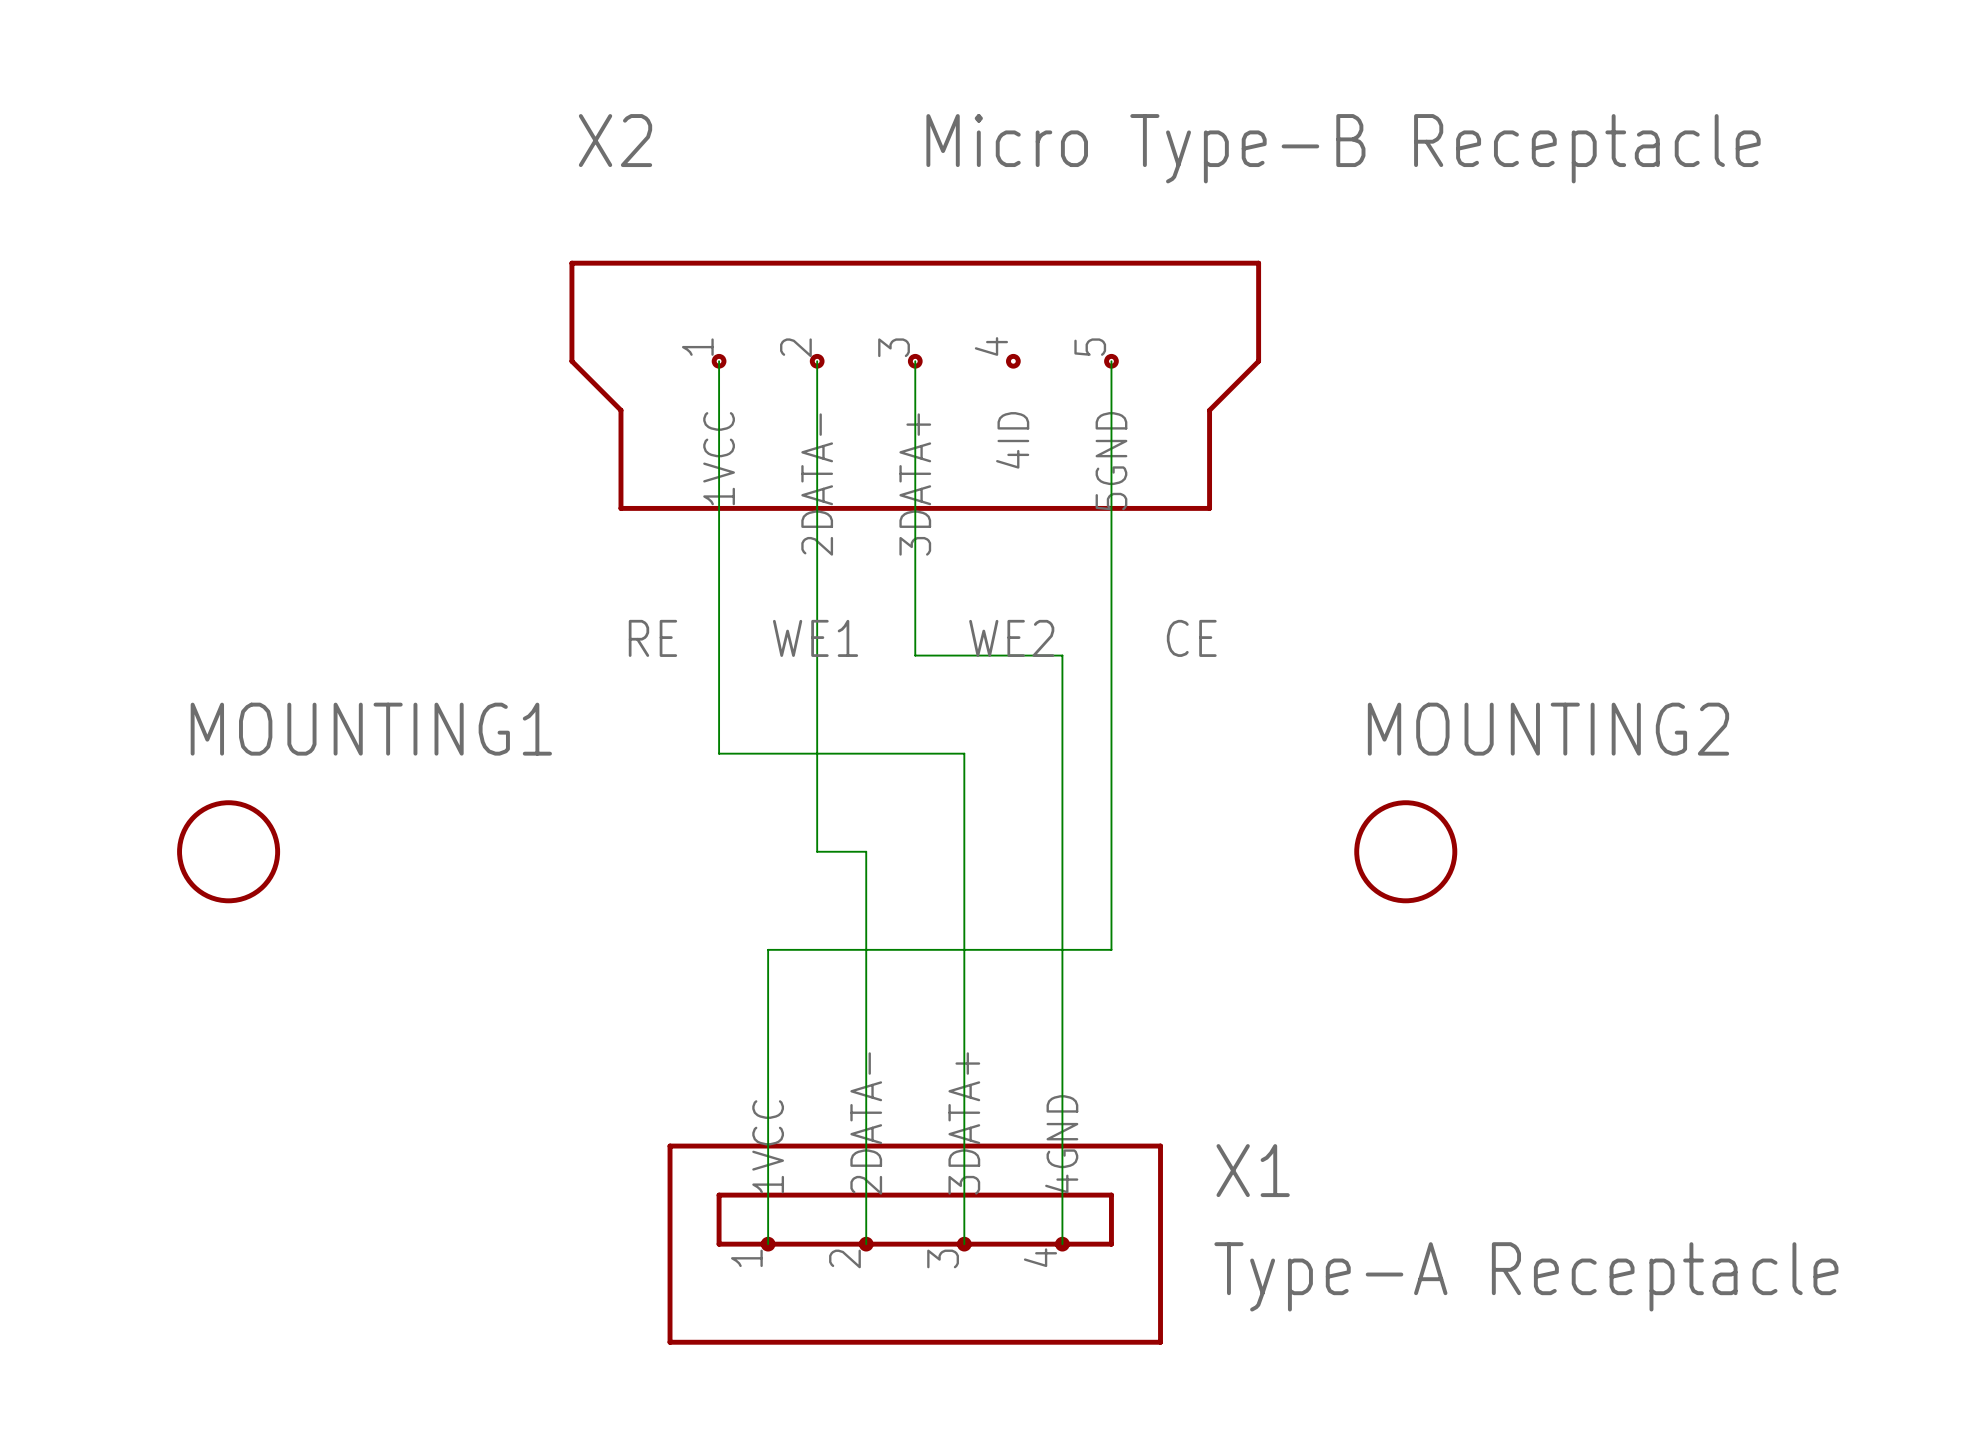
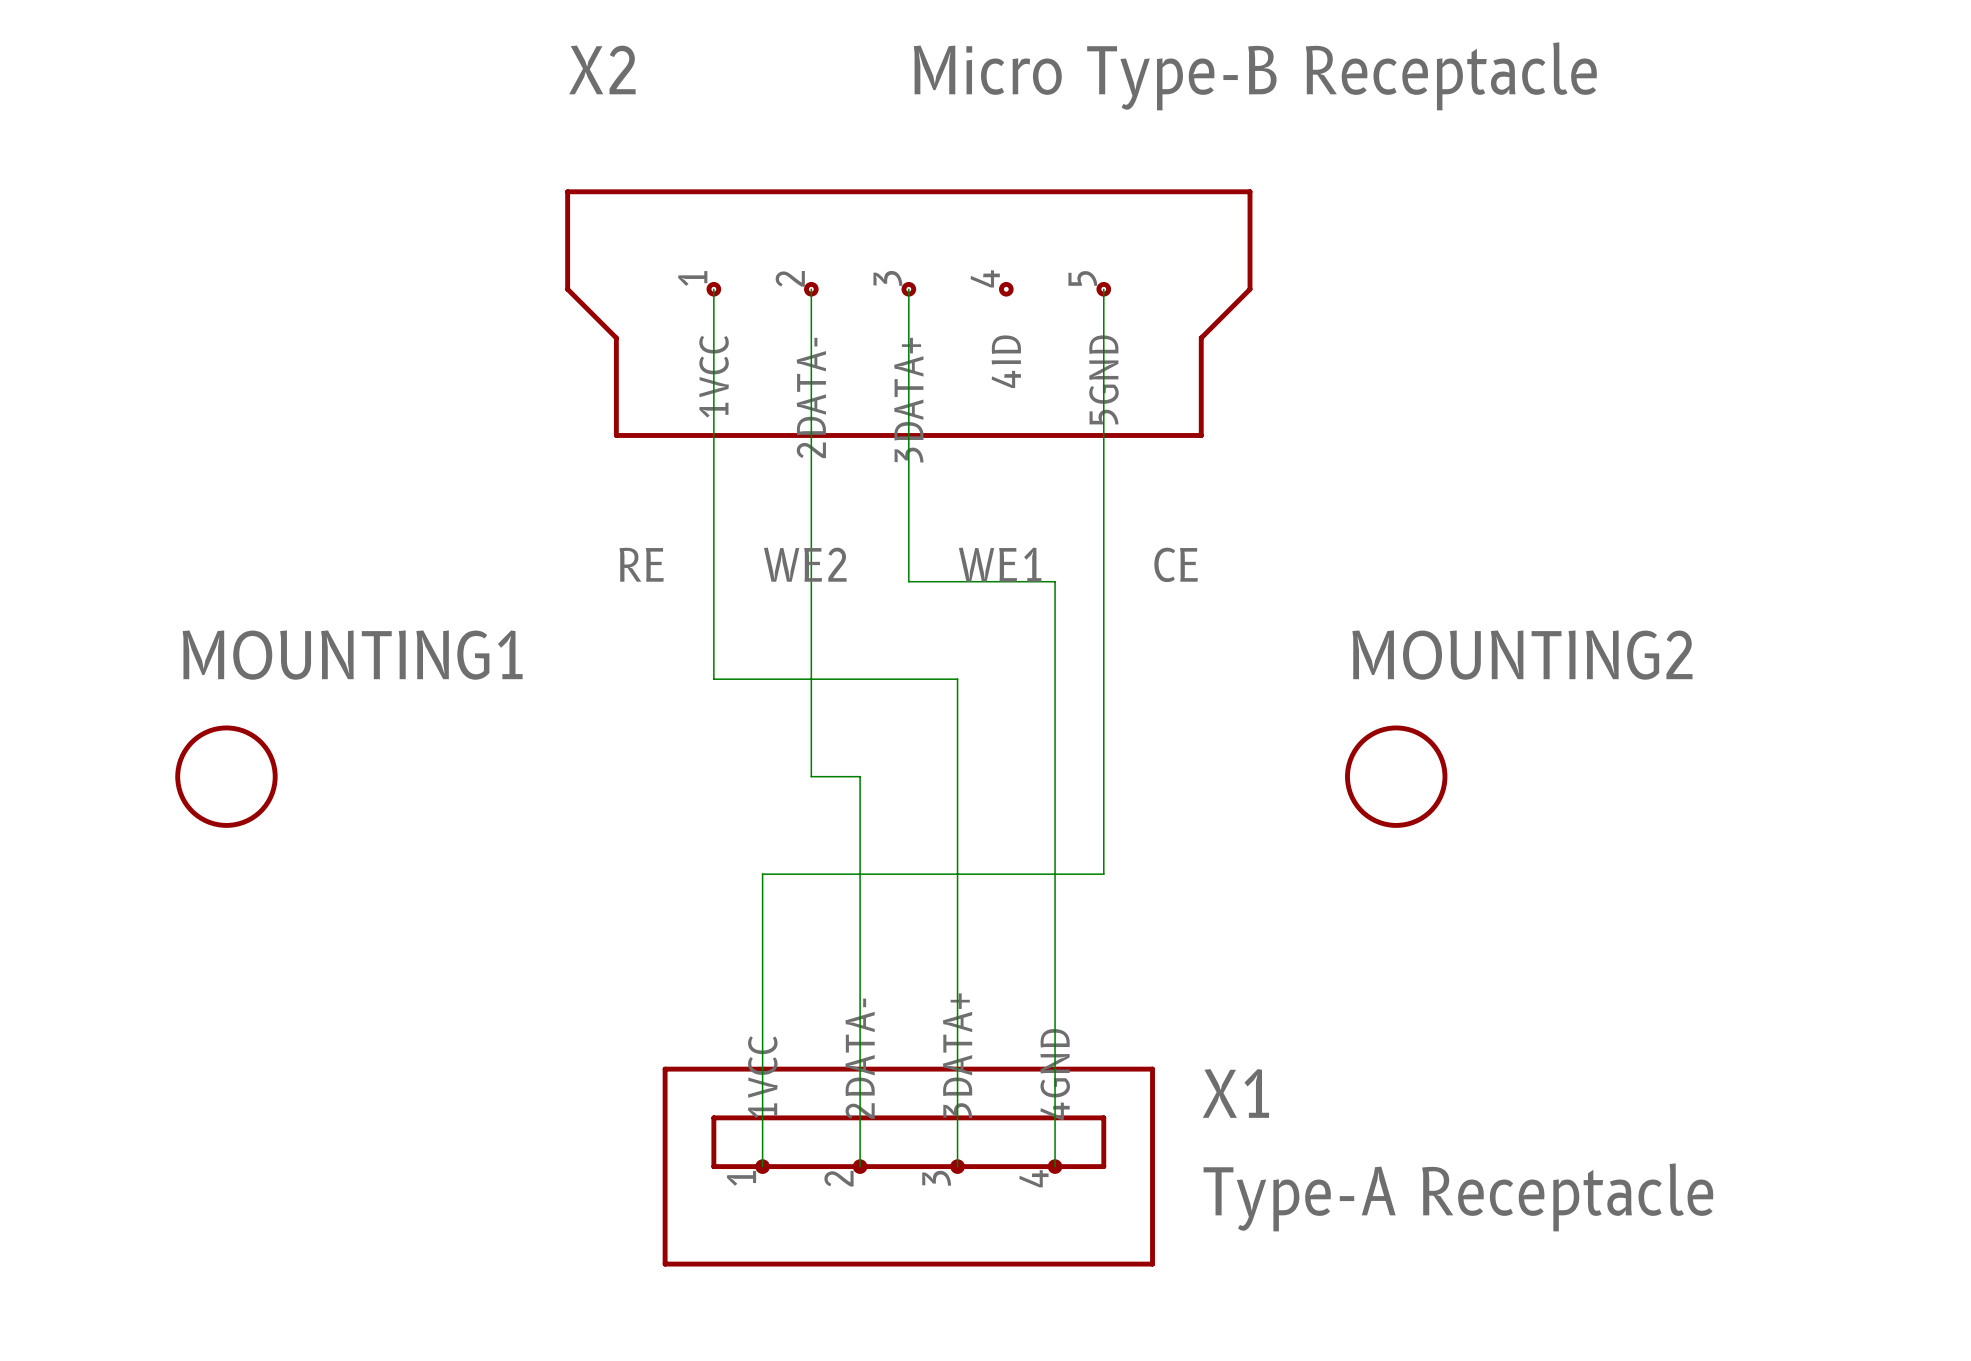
label: WE1 (815, 638) -> WE2 (805, 564)
label: WE2 (1011, 638) -> WE1 (1000, 564)

